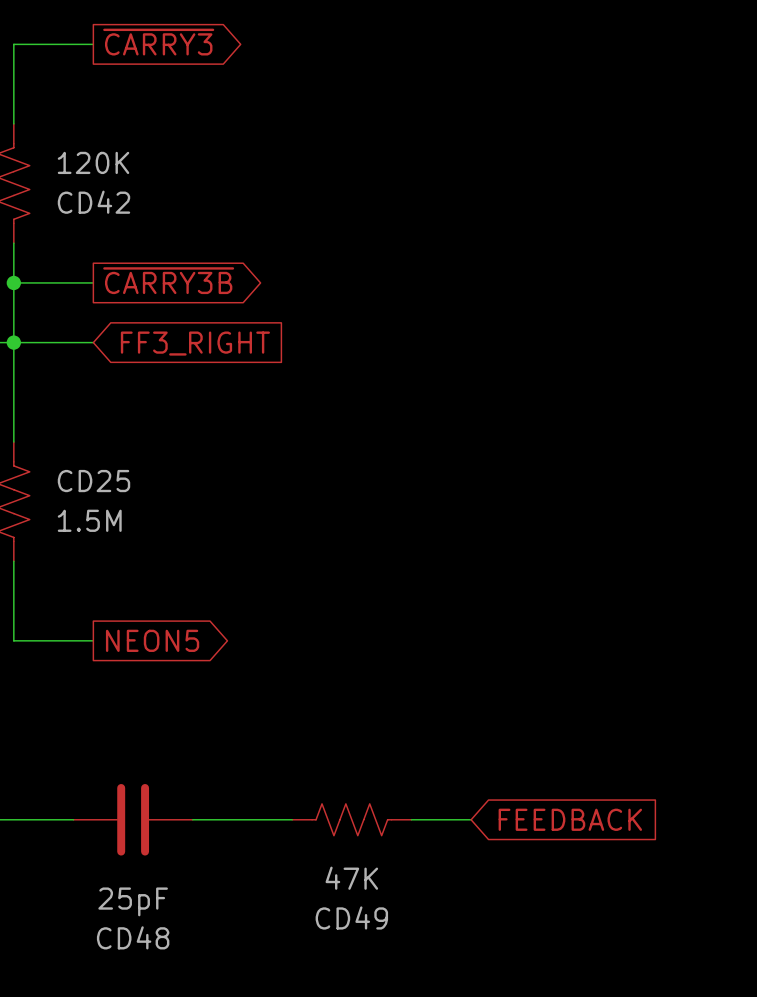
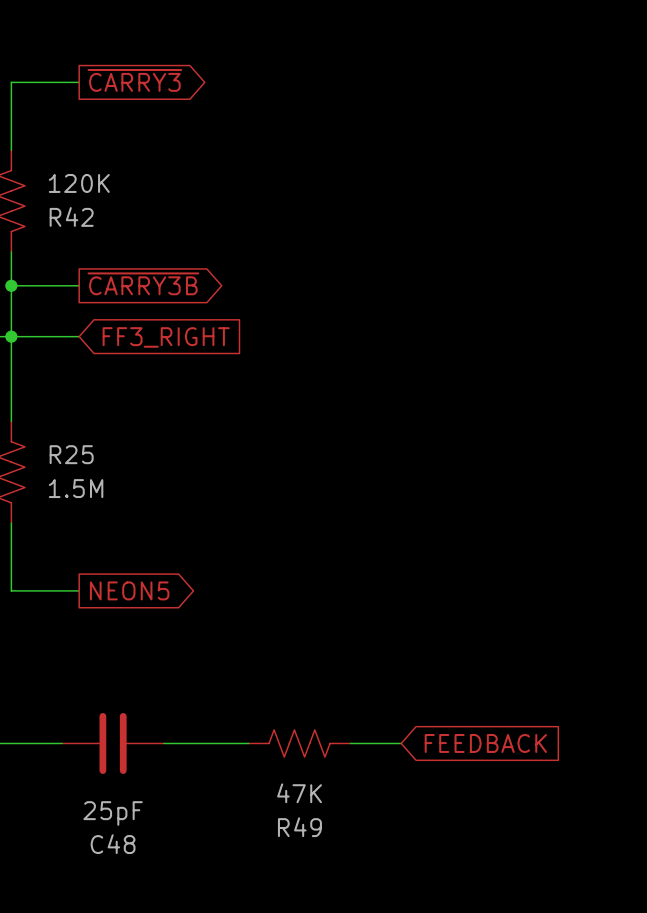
CD42 name: CD42 (93, 202) -> R42 (71, 216)
CD25 name: CD25 (93, 481) -> R25 (71, 454)
CD49 name: CD49 (351, 917) -> R49 (299, 827)
CD48 name: CD48 (133, 937) -> C48 (113, 844)

